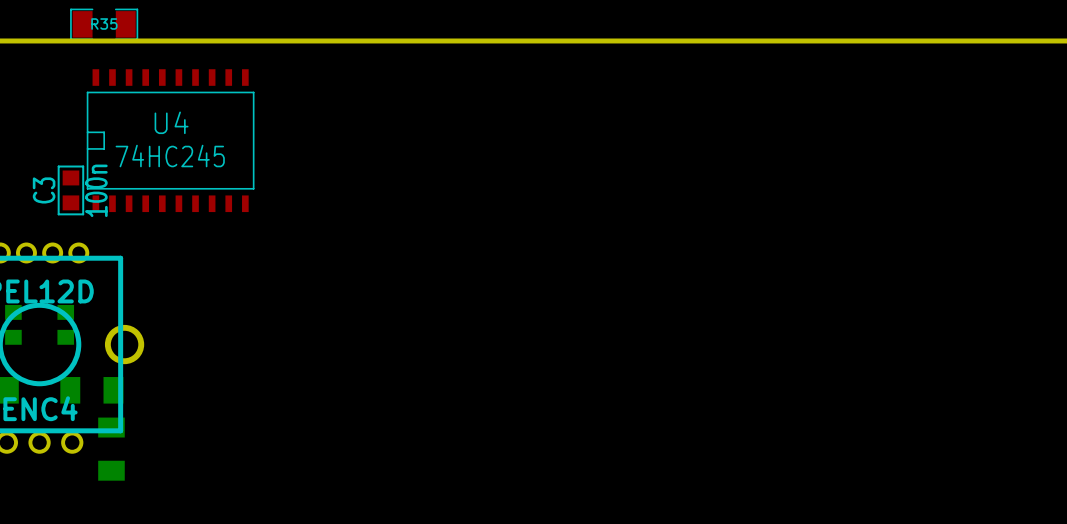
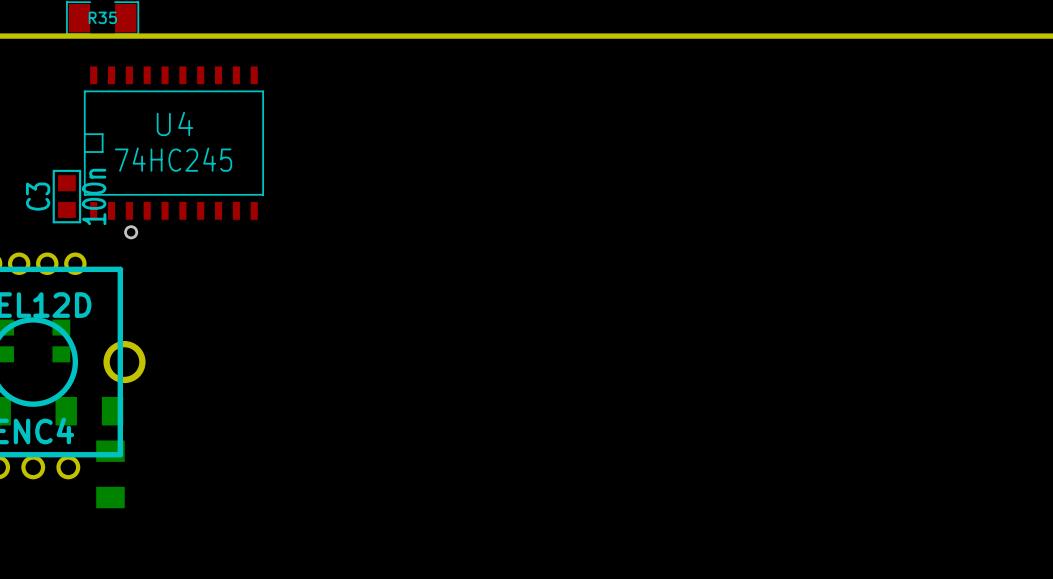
via: none -> (131, 232)

